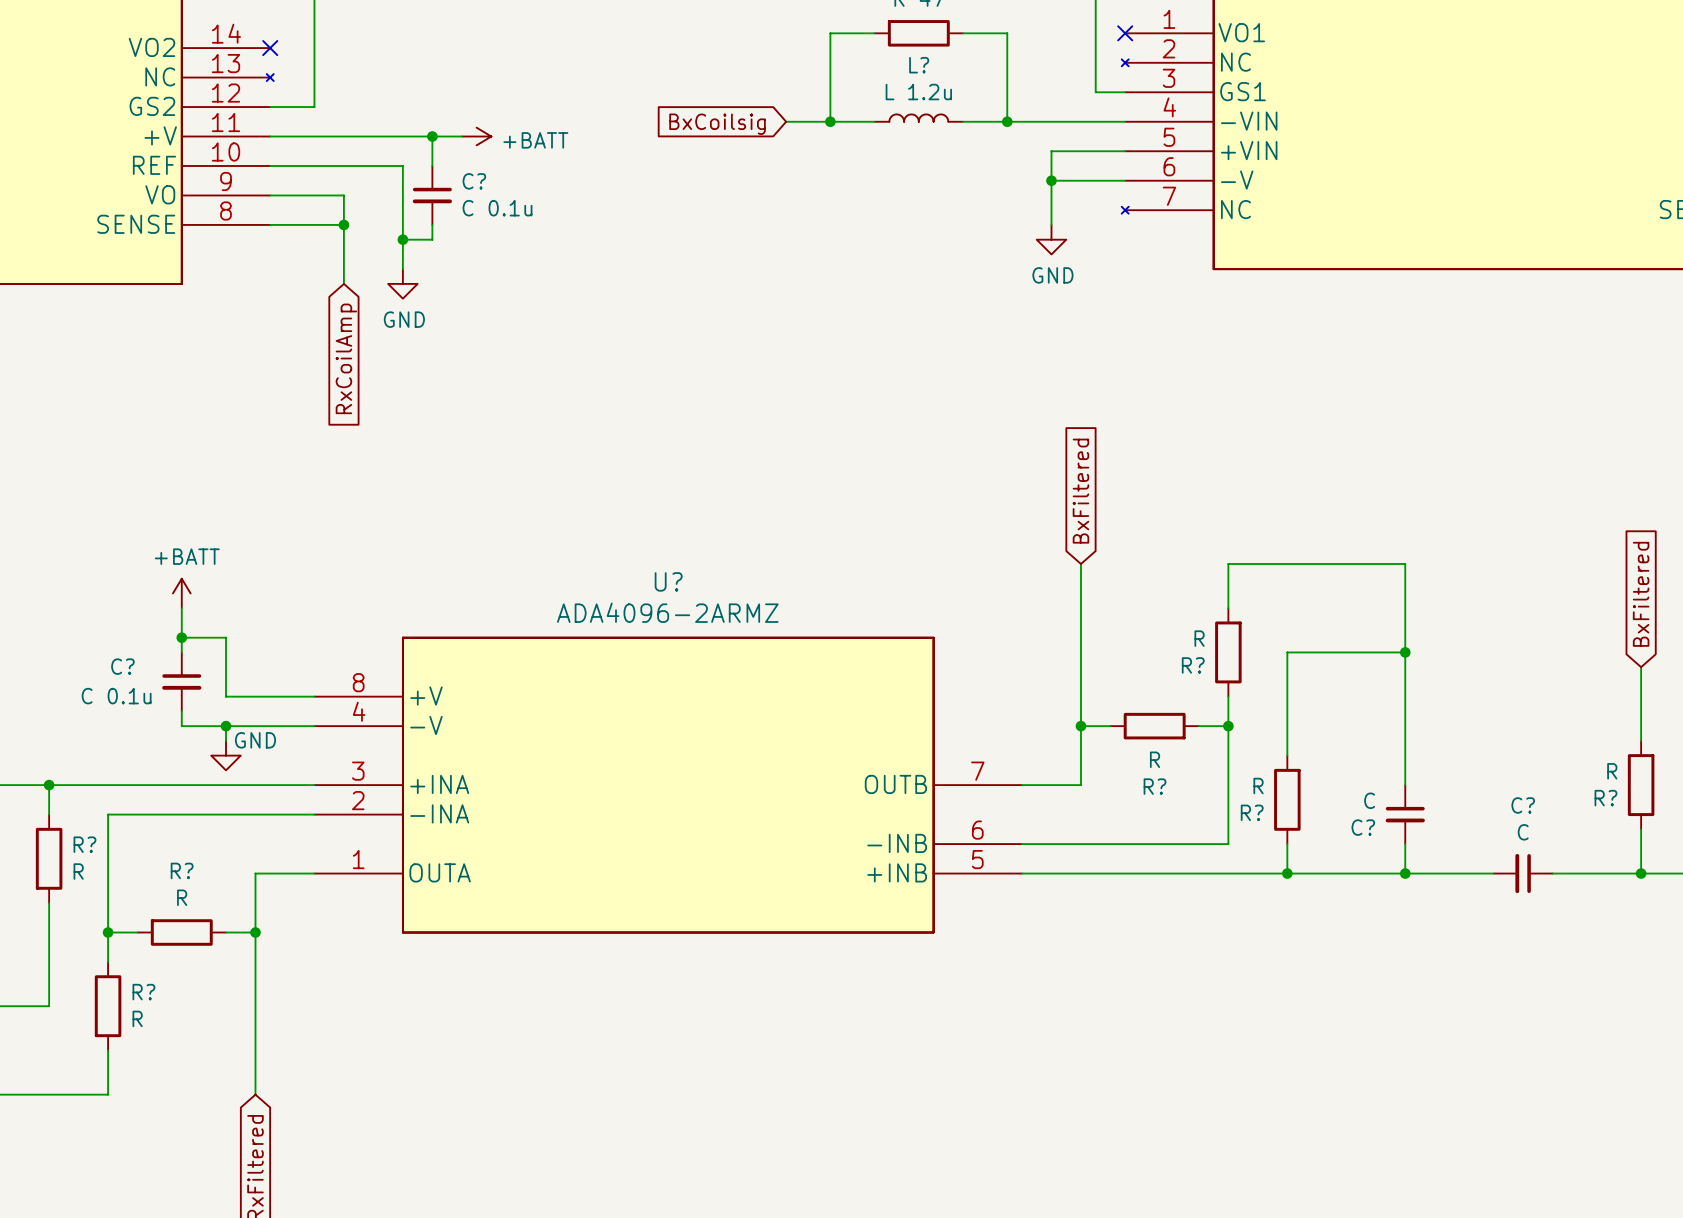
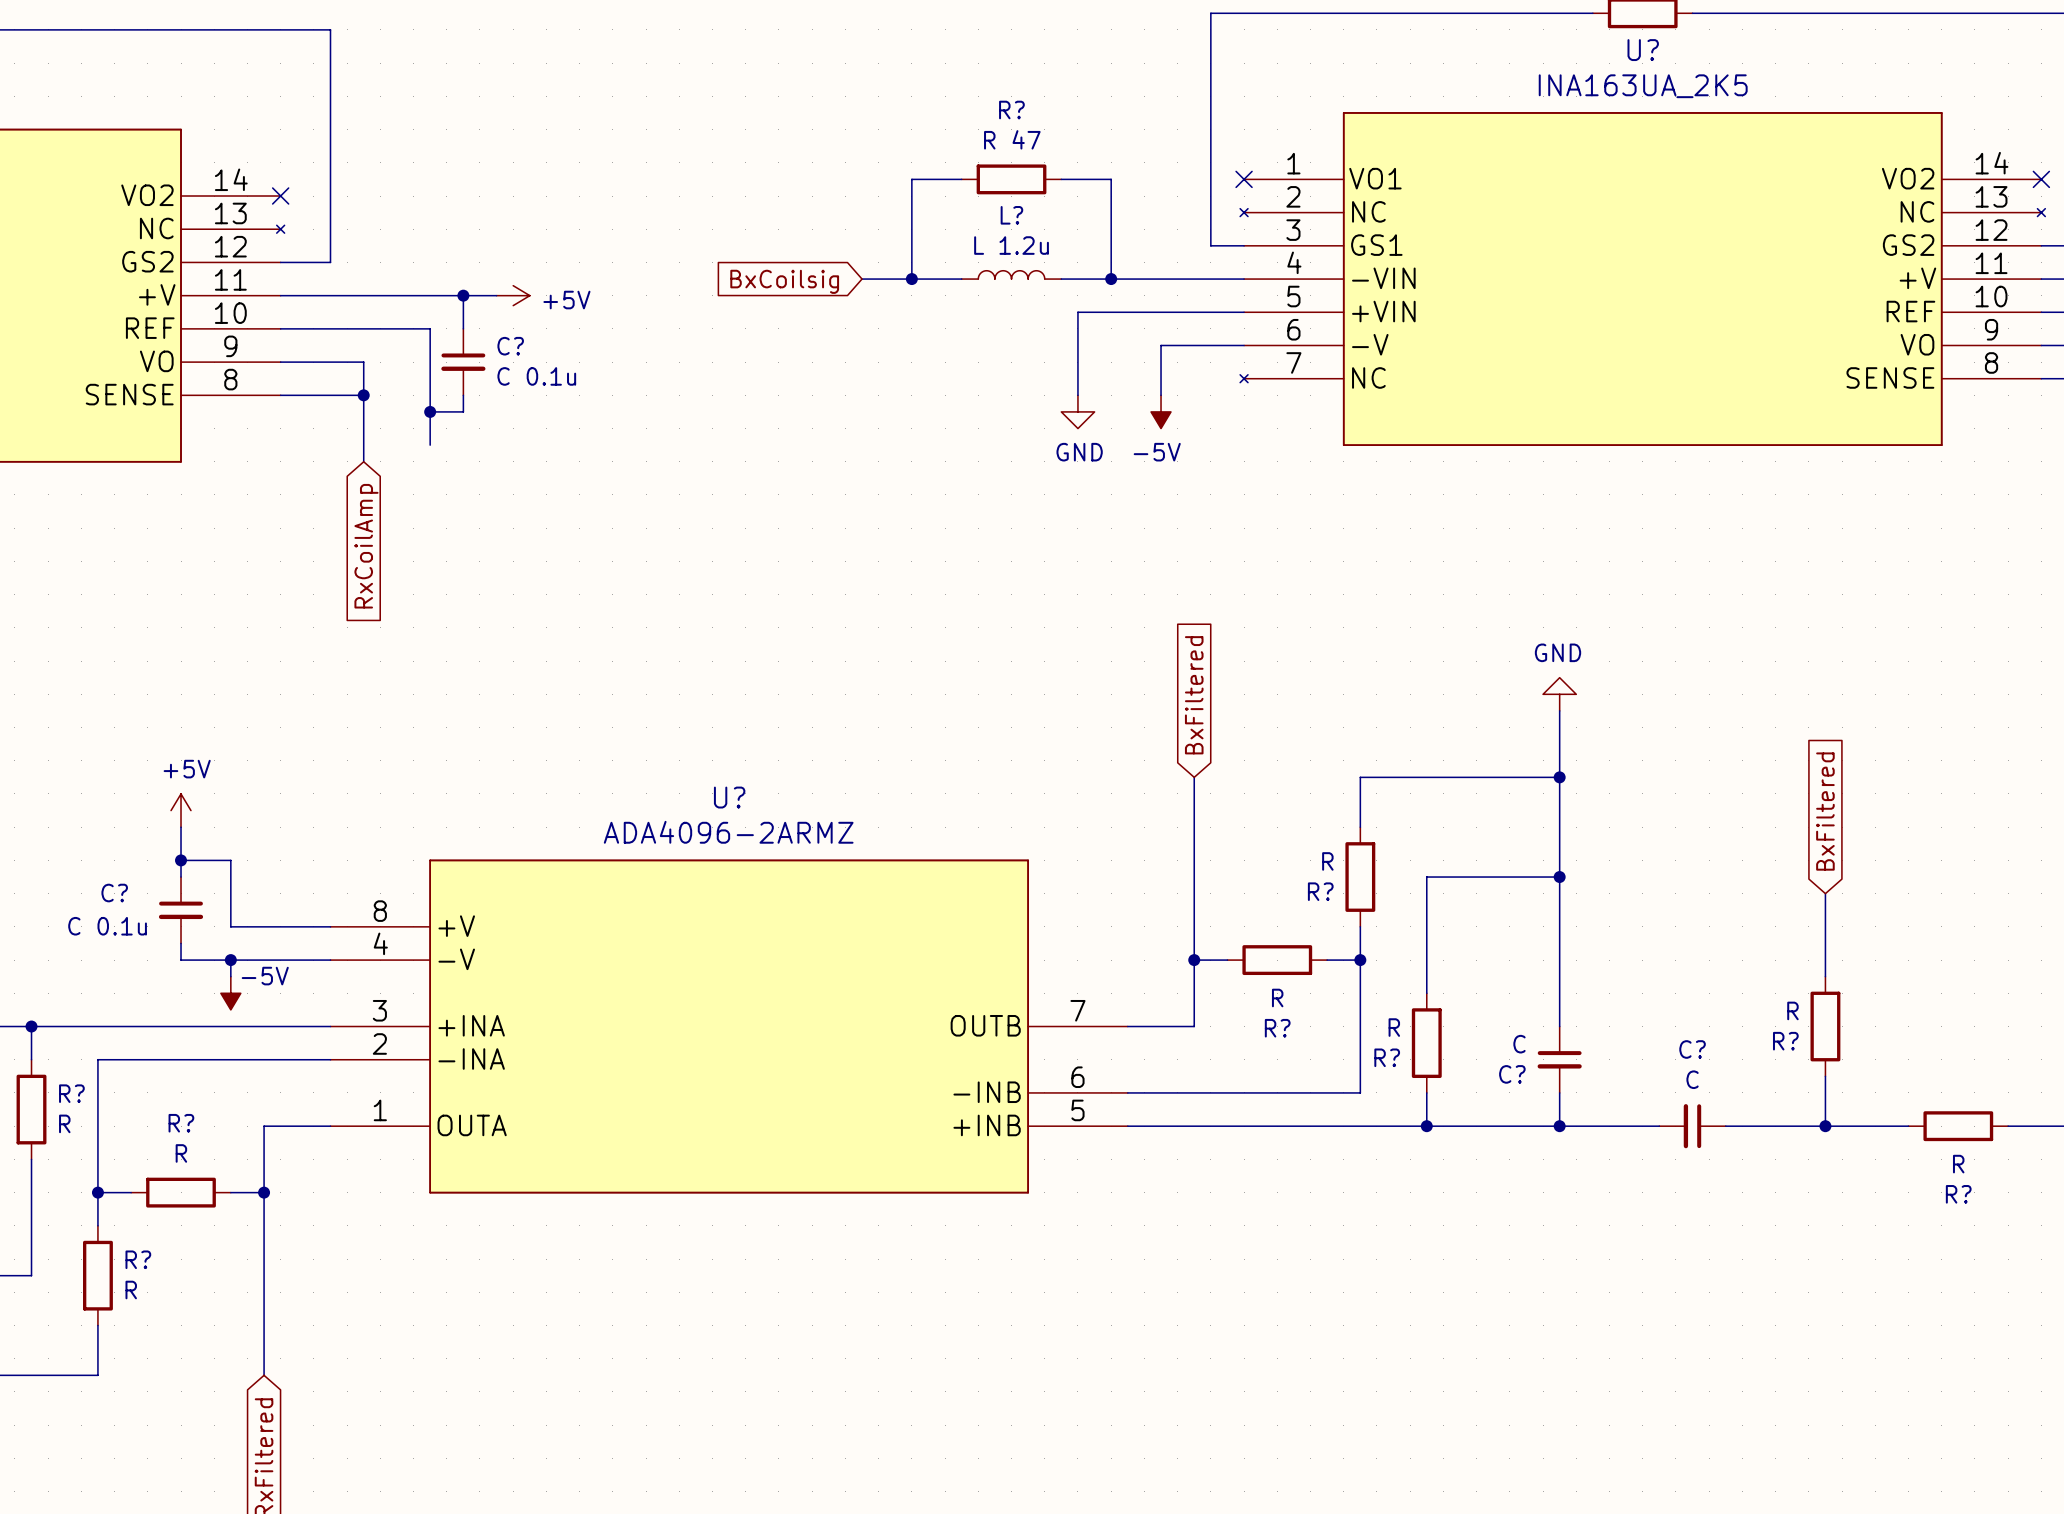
power symbol: +BATT (476, 136) -> +5V (513, 295)
wire: (1051, 151) (1051, 180) -> (1161, 312) (1077, 312) (1077, 395)
junction: (1051, 180) -> none
power symbol: none -> GND (1077, 411)
power symbol: GND (1051, 239) -> -5V (1161, 411)
power symbol: GND (402, 283) -> none
power symbol: none -> GND (1559, 694)
wire: none -> (1559, 710) (1559, 777)
junction: none -> (1559, 777)
power symbol: +BATT (181, 593) -> +5V (181, 810)
power symbol: GND (226, 755) -> -5V (230, 993)

